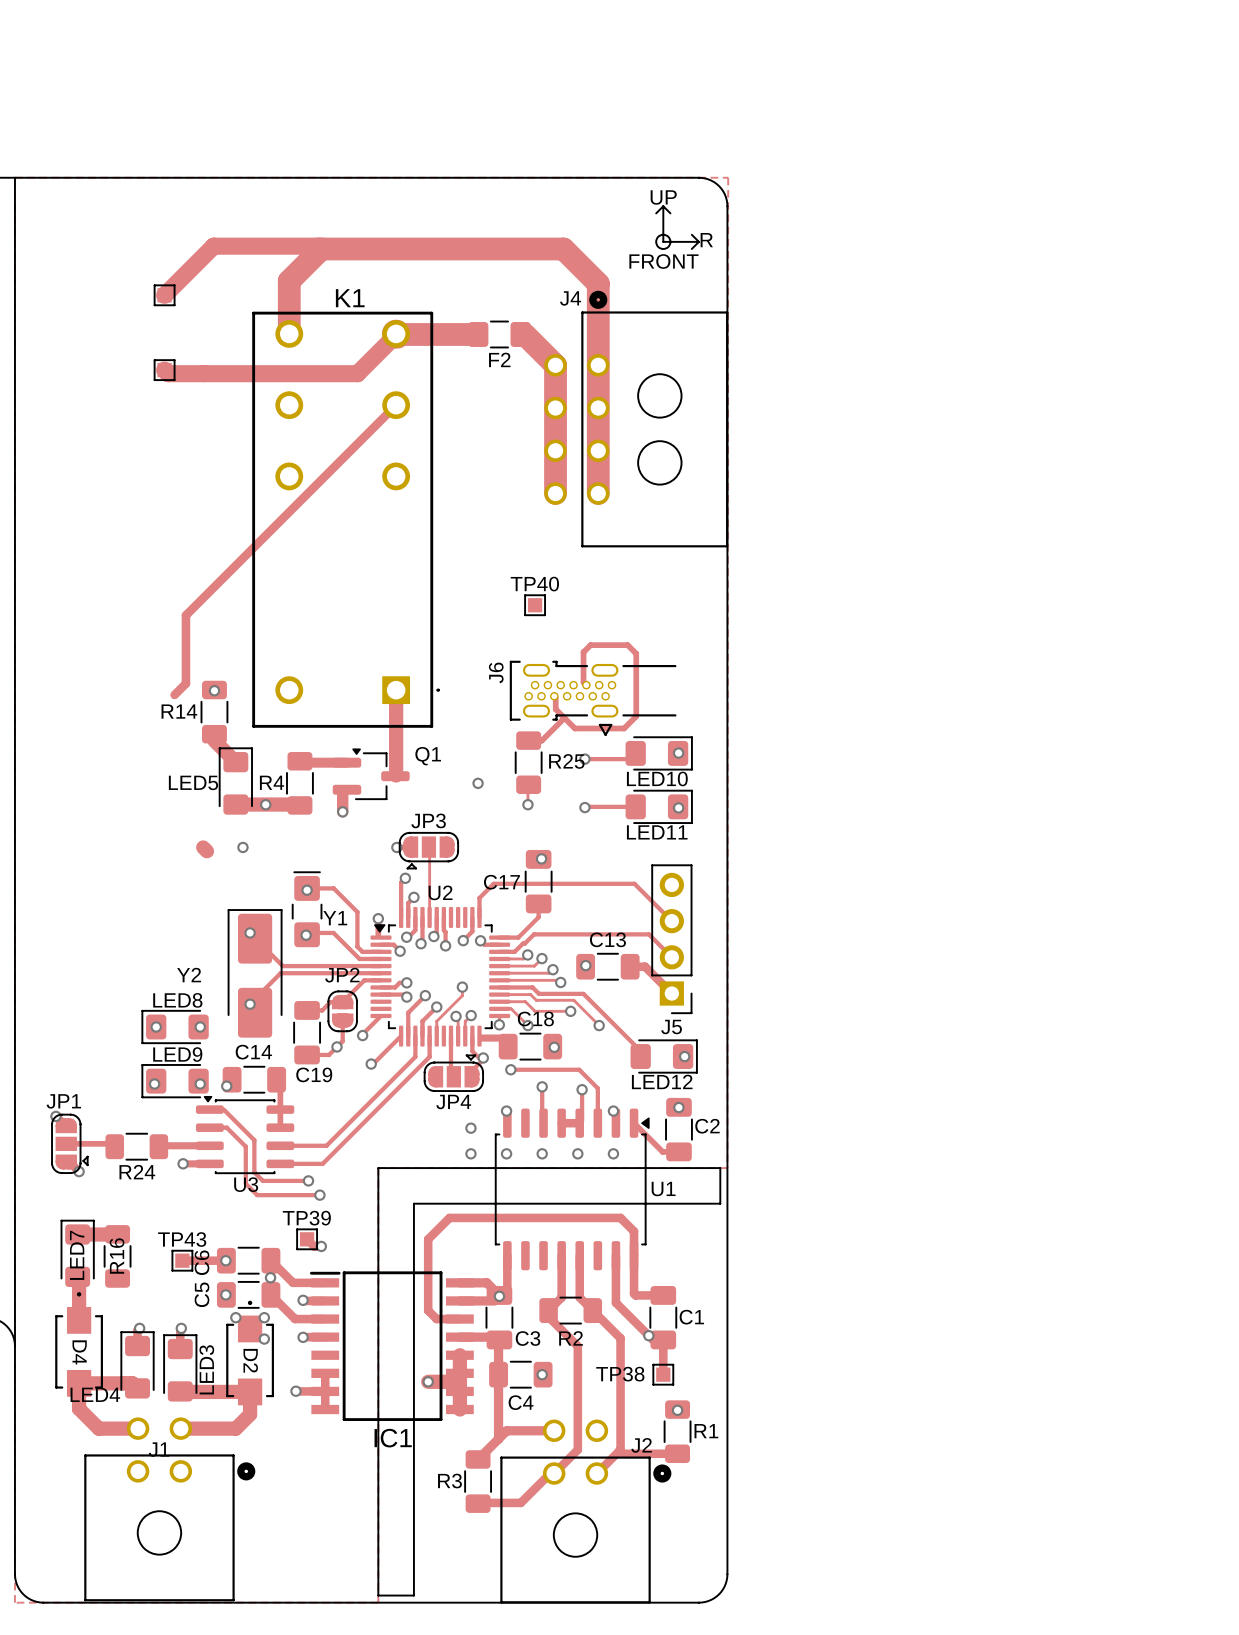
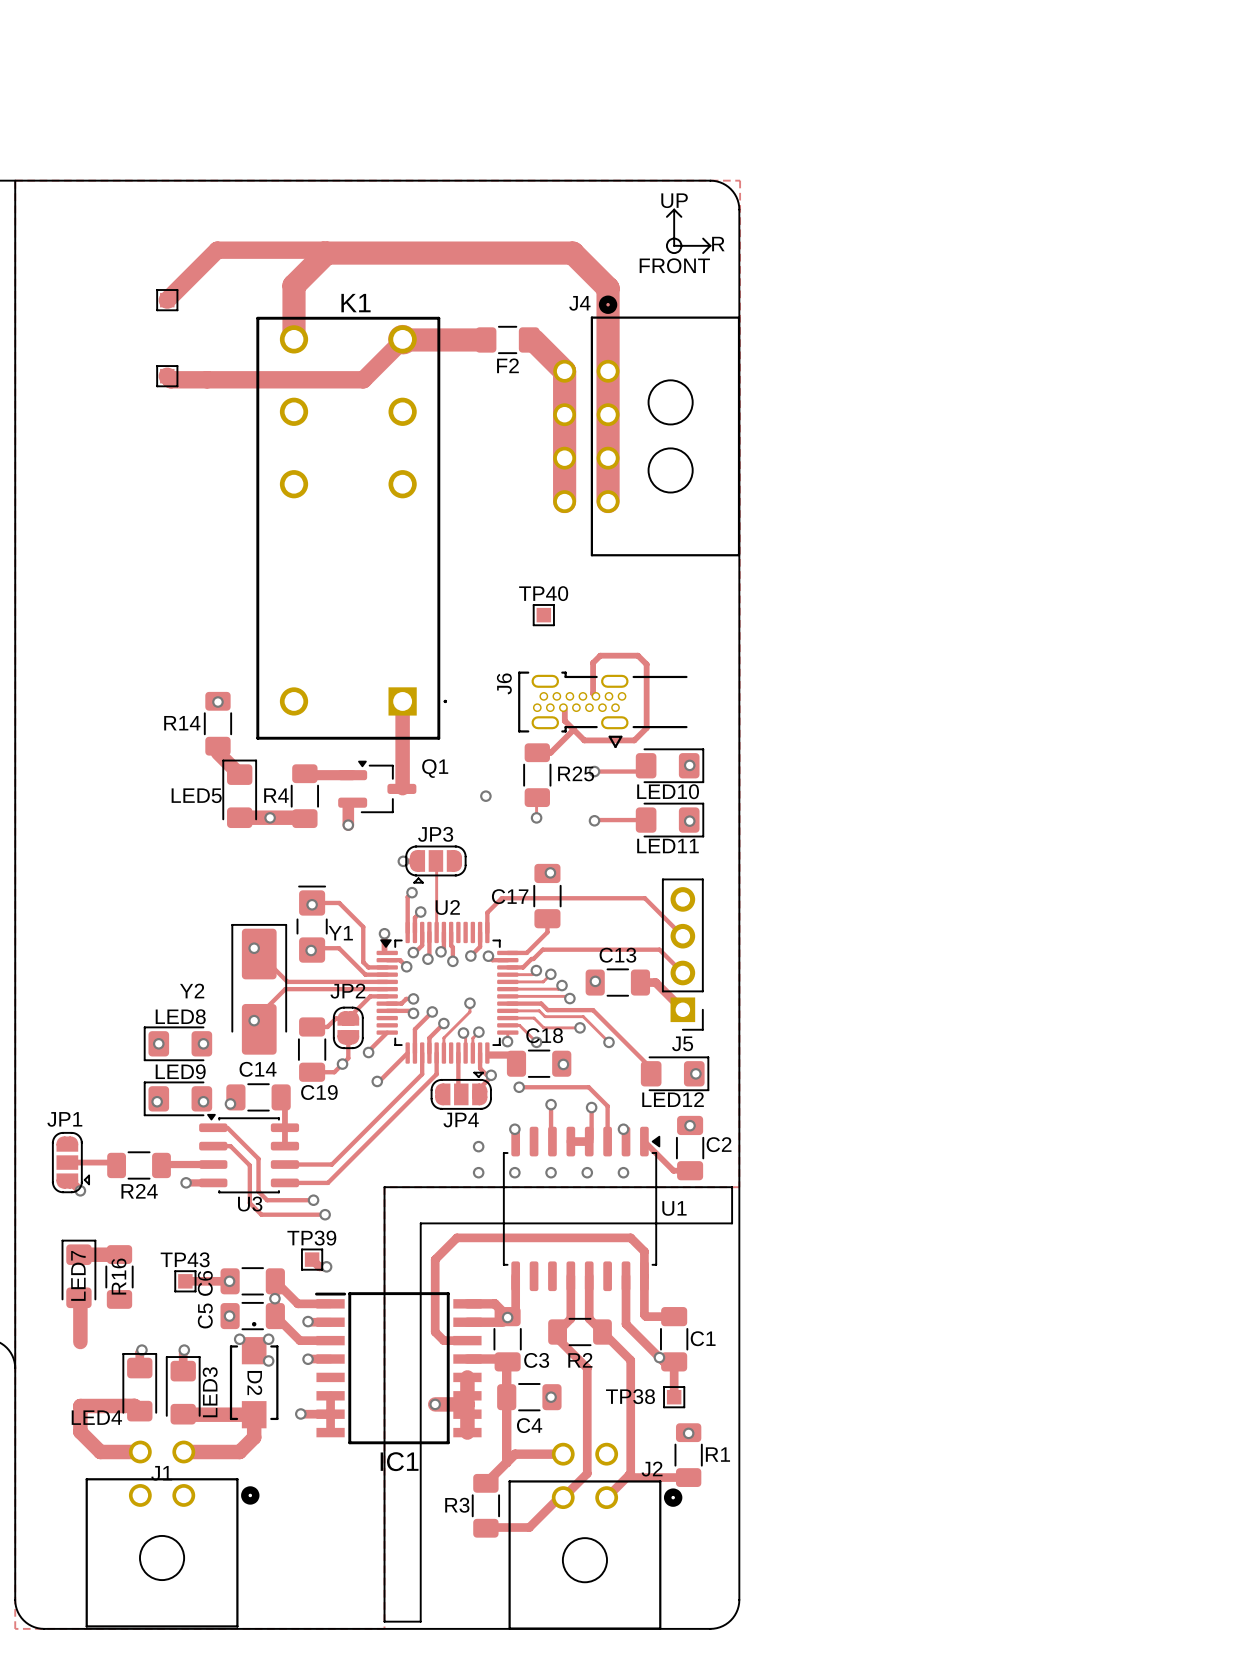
track: (396, 405) (185, 615) (185, 683) (174, 694) -> none
track: (203, 847) (206, 851) -> none
via: (242, 847) -> none
via: (55, 1116) -> none
D4: (79, 1344) -> none

